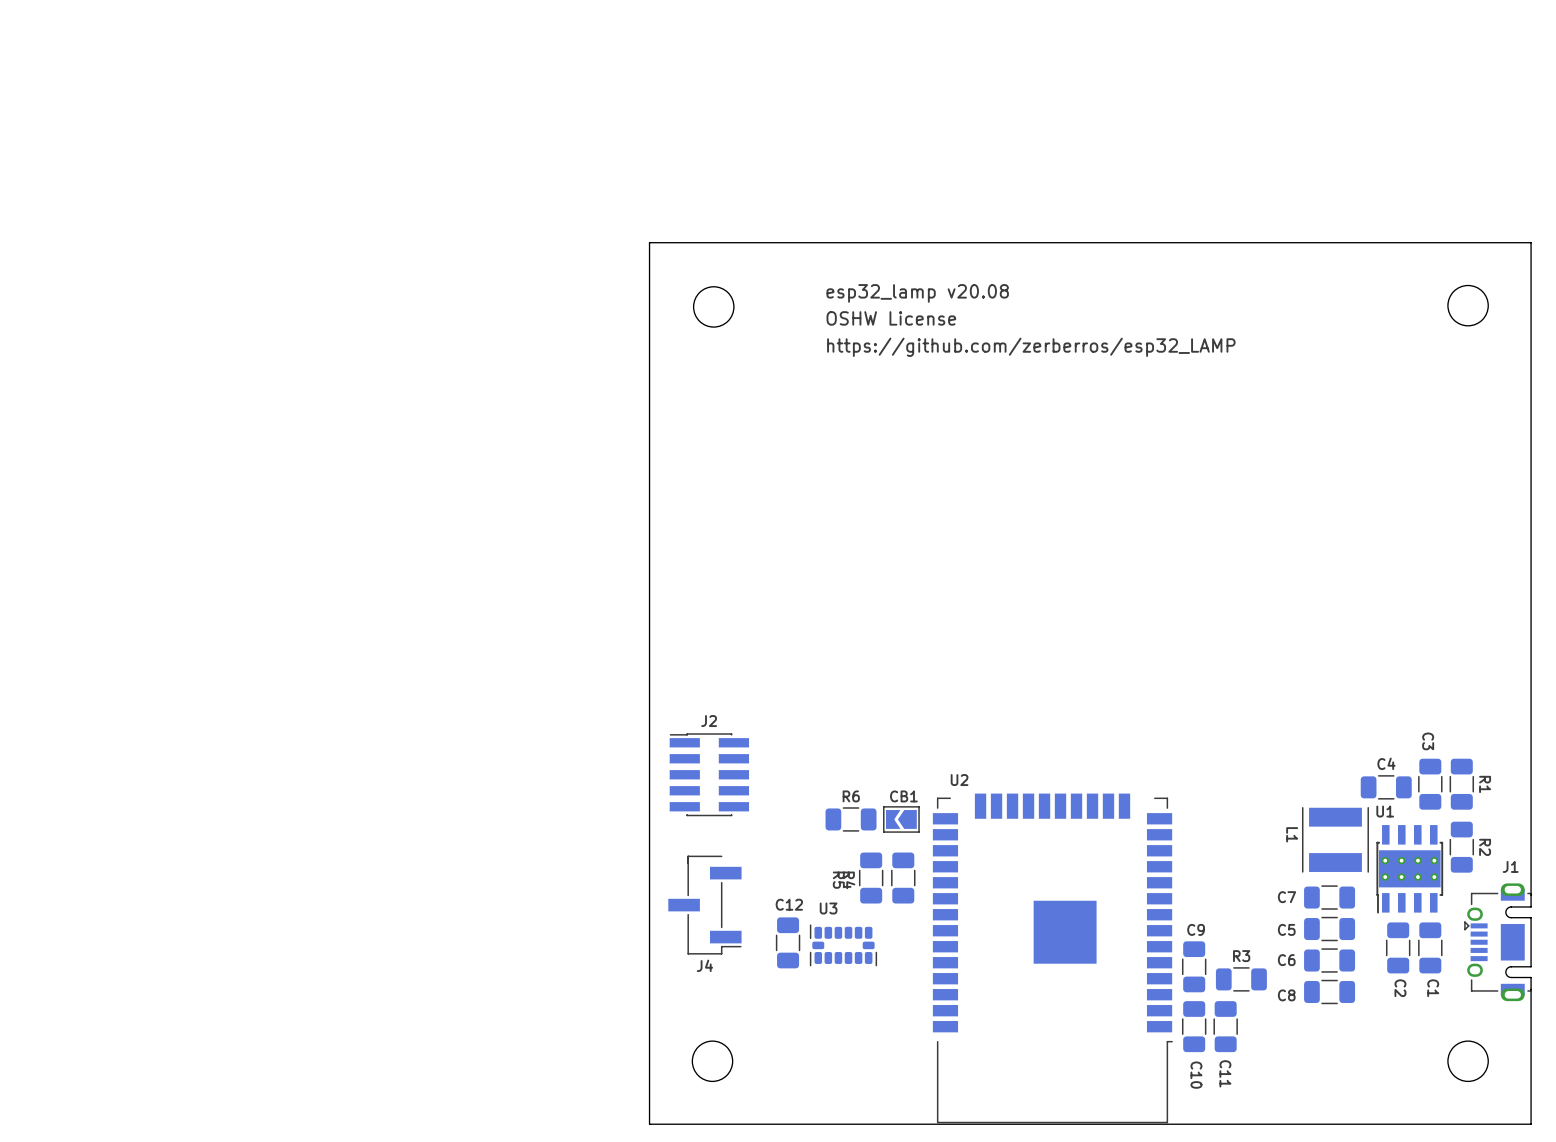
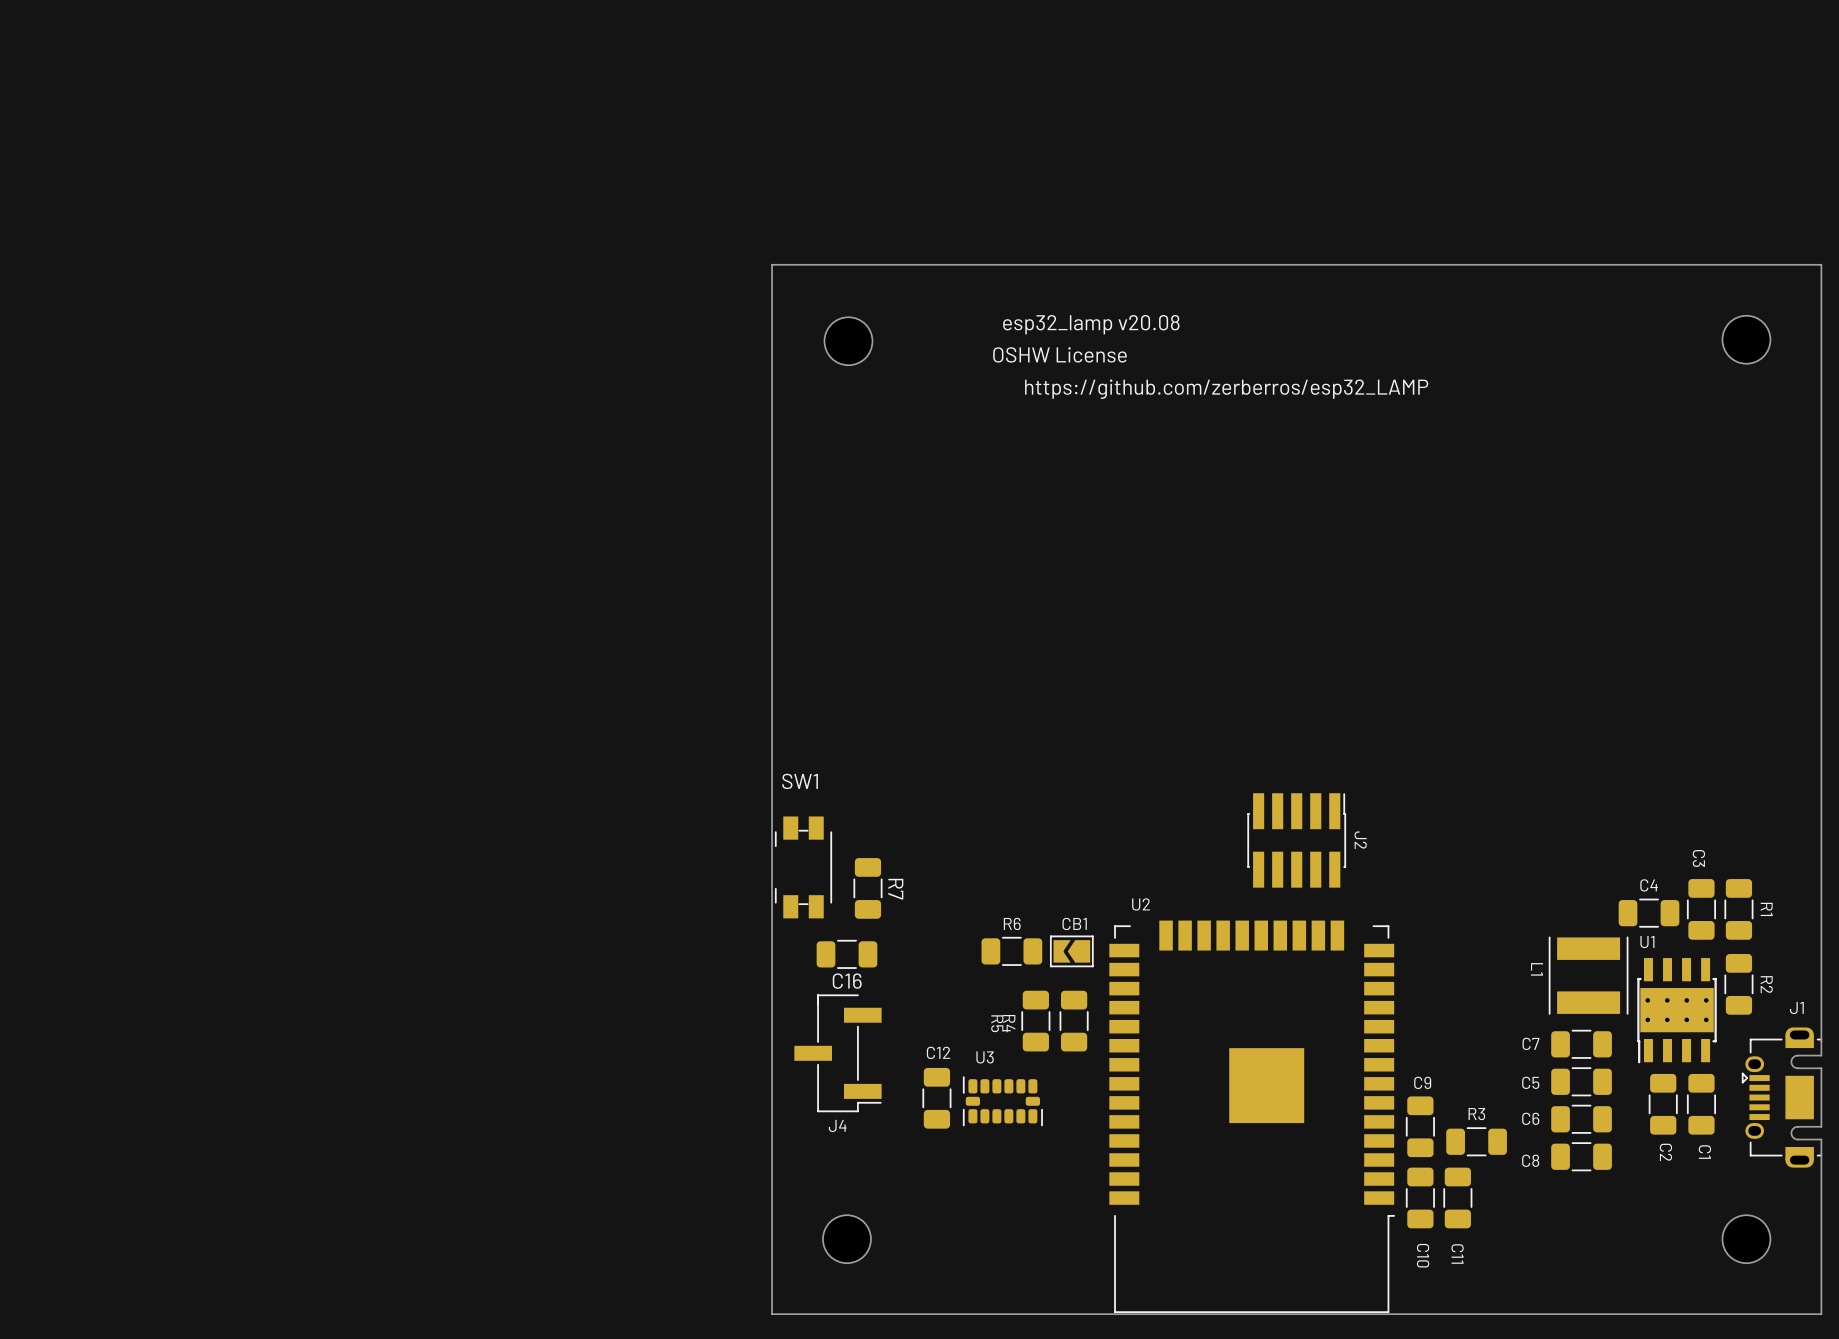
SW1: none -> (803, 867)
R7: none -> (867, 888)
J2 rotation: 0° (709, 774) -> 90° clockwise (1296, 840)
J2 position: (709, 774) -> (1296, 840)
C16: none -> (846, 954)

